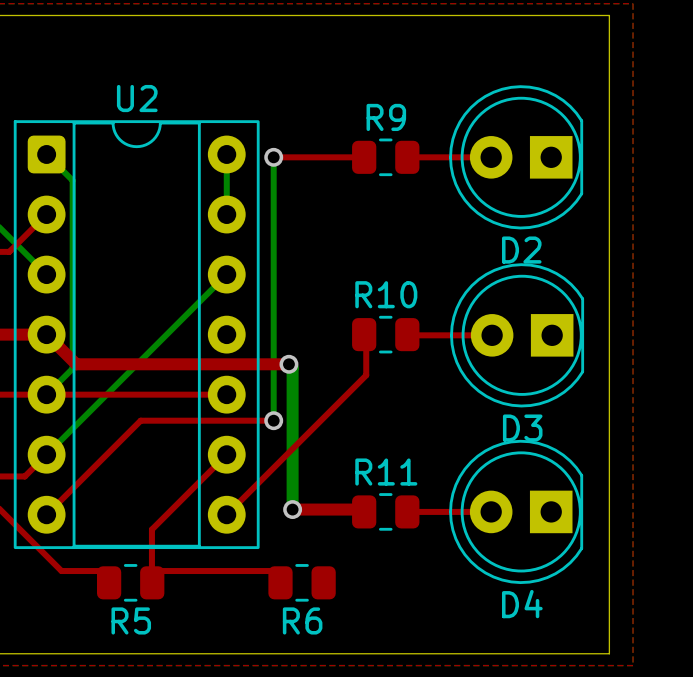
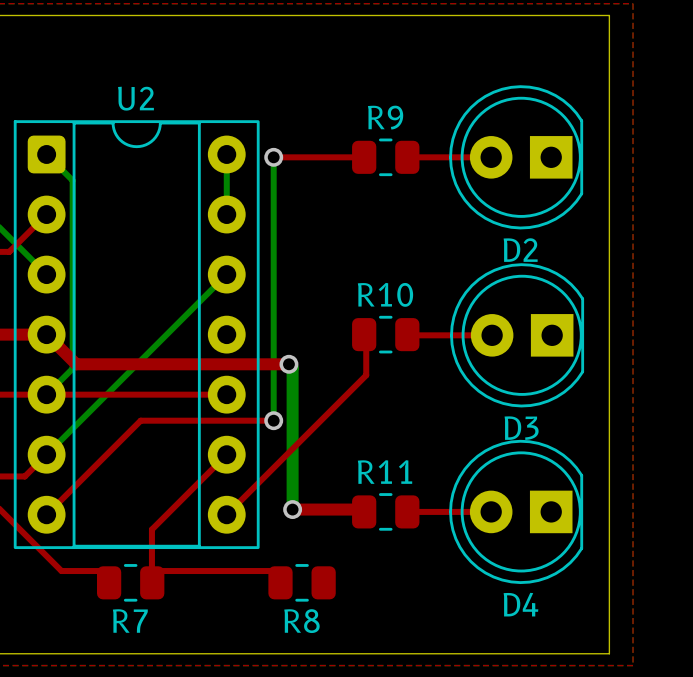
R5 name: R5 (131, 620) -> R7 (130, 621)
R6 name: R6 (302, 620) -> R8 (301, 621)

